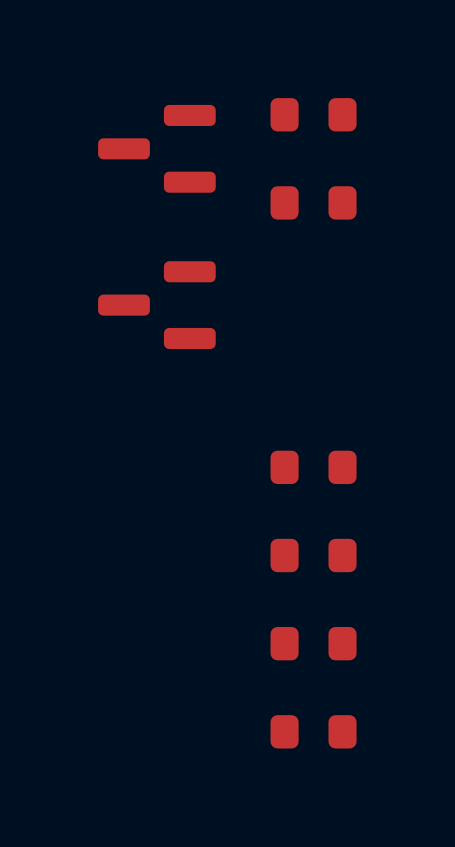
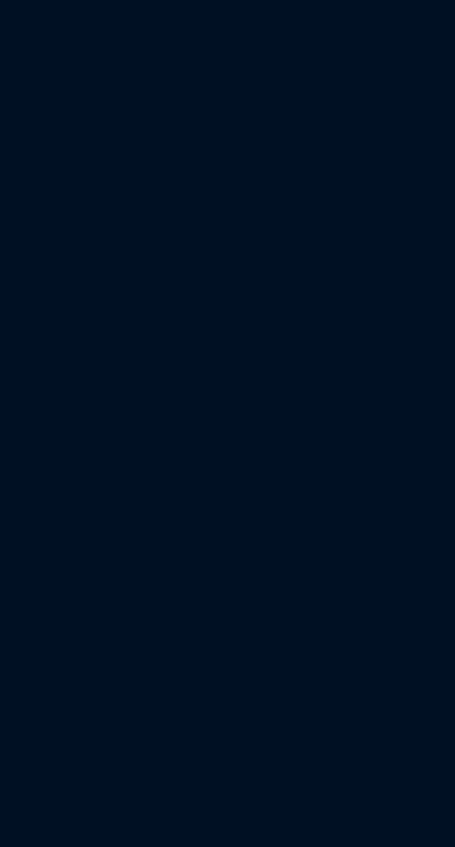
part: (313, 114) -> none
part: (156, 148) -> none
part: (313, 202) -> none
part: (156, 305) -> none
part: (313, 467) -> none
part: (313, 555) -> none
part: (313, 643) -> none
part: (313, 731) -> none

